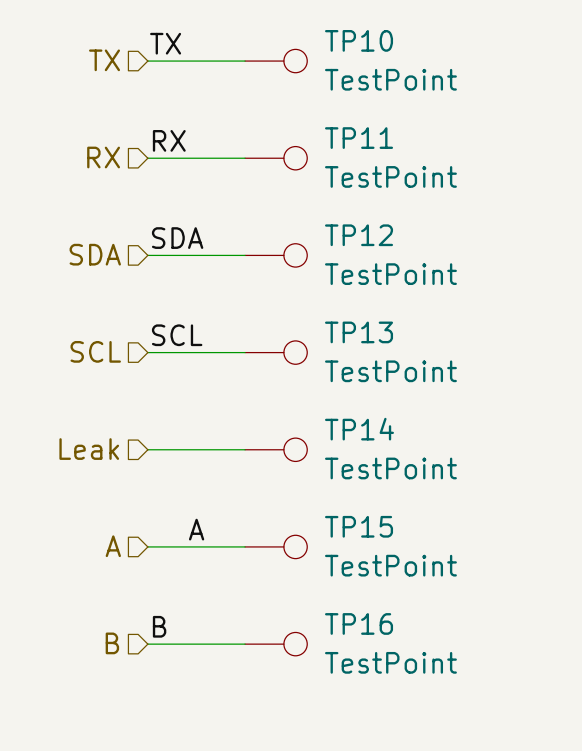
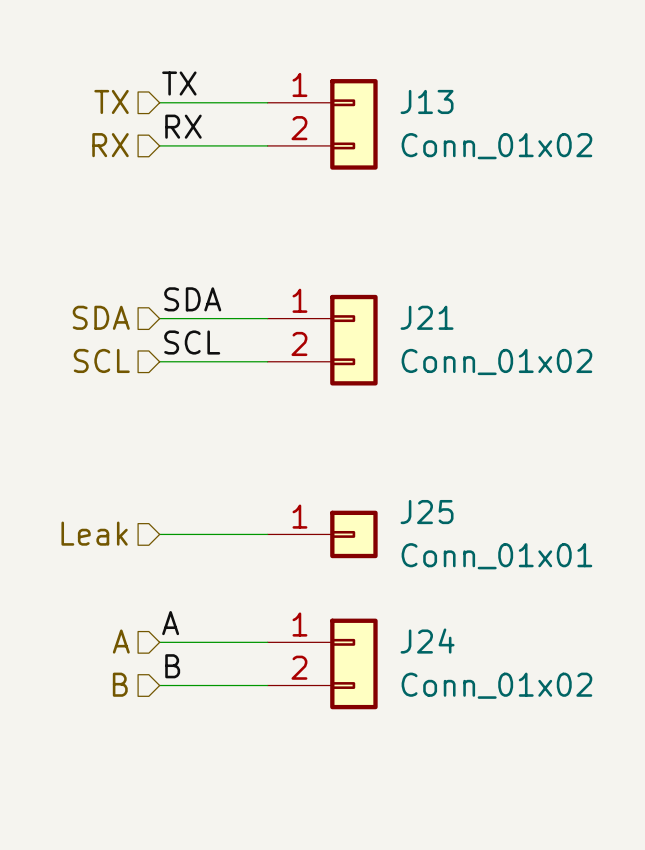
TP10: TestPoint (276, 61) -> none
J13: none -> Conn_01x02 (322, 124)
label position: RX (169, 140) -> RX (183, 126)
hierarchical label position: RX (103, 157) -> RX (110, 145)
wire: (147, 158) (245, 158) -> (159, 145) (267, 145)
TP11: TestPoint (276, 158) -> none
TP12: TestPoint (276, 255) -> none
J21: none -> Conn_01x02 (322, 340)
label position: SCL (177, 335) -> SCL (192, 342)
hierarchical label position: SCL (95, 351) -> SCL (101, 360)
wire: (147, 352) (245, 352) -> (159, 361) (267, 361)
TP13: TestPoint (276, 352) -> none
TP14: TestPoint (276, 449) -> none
J25: none -> Conn_01x01 (322, 534)
label position: A (196, 529) -> A (170, 623)
TP15: TestPoint (276, 546) -> none
J24: none -> Conn_01x02 (322, 663)
label position: B (159, 626) -> B (172, 666)
hierarchical label position: B (112, 643) -> B (120, 684)
wire: (147, 644) (245, 644) -> (159, 685) (267, 685)
TP16: TestPoint (276, 644) -> none

